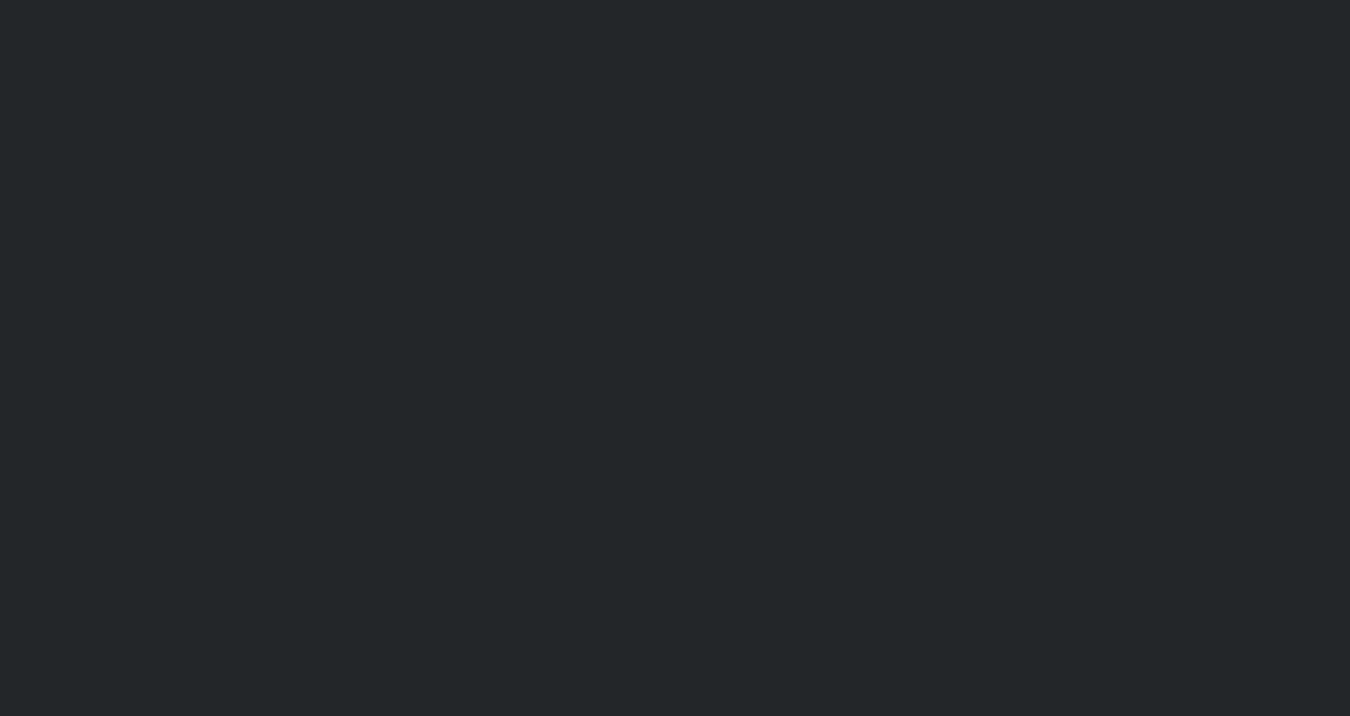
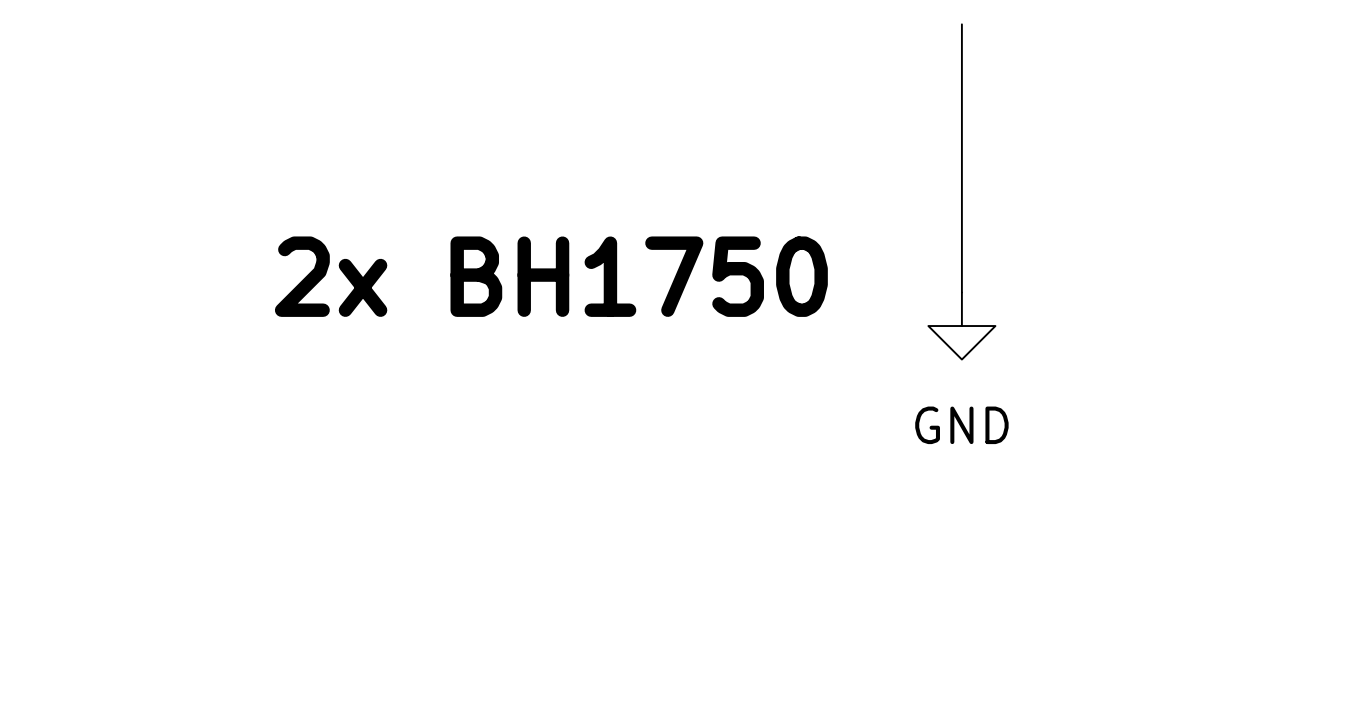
wire: none -> (961, 24) (961, 292)
text: none -> 2x BH1750 (551, 276)
power symbol: none -> GND (961, 326)

